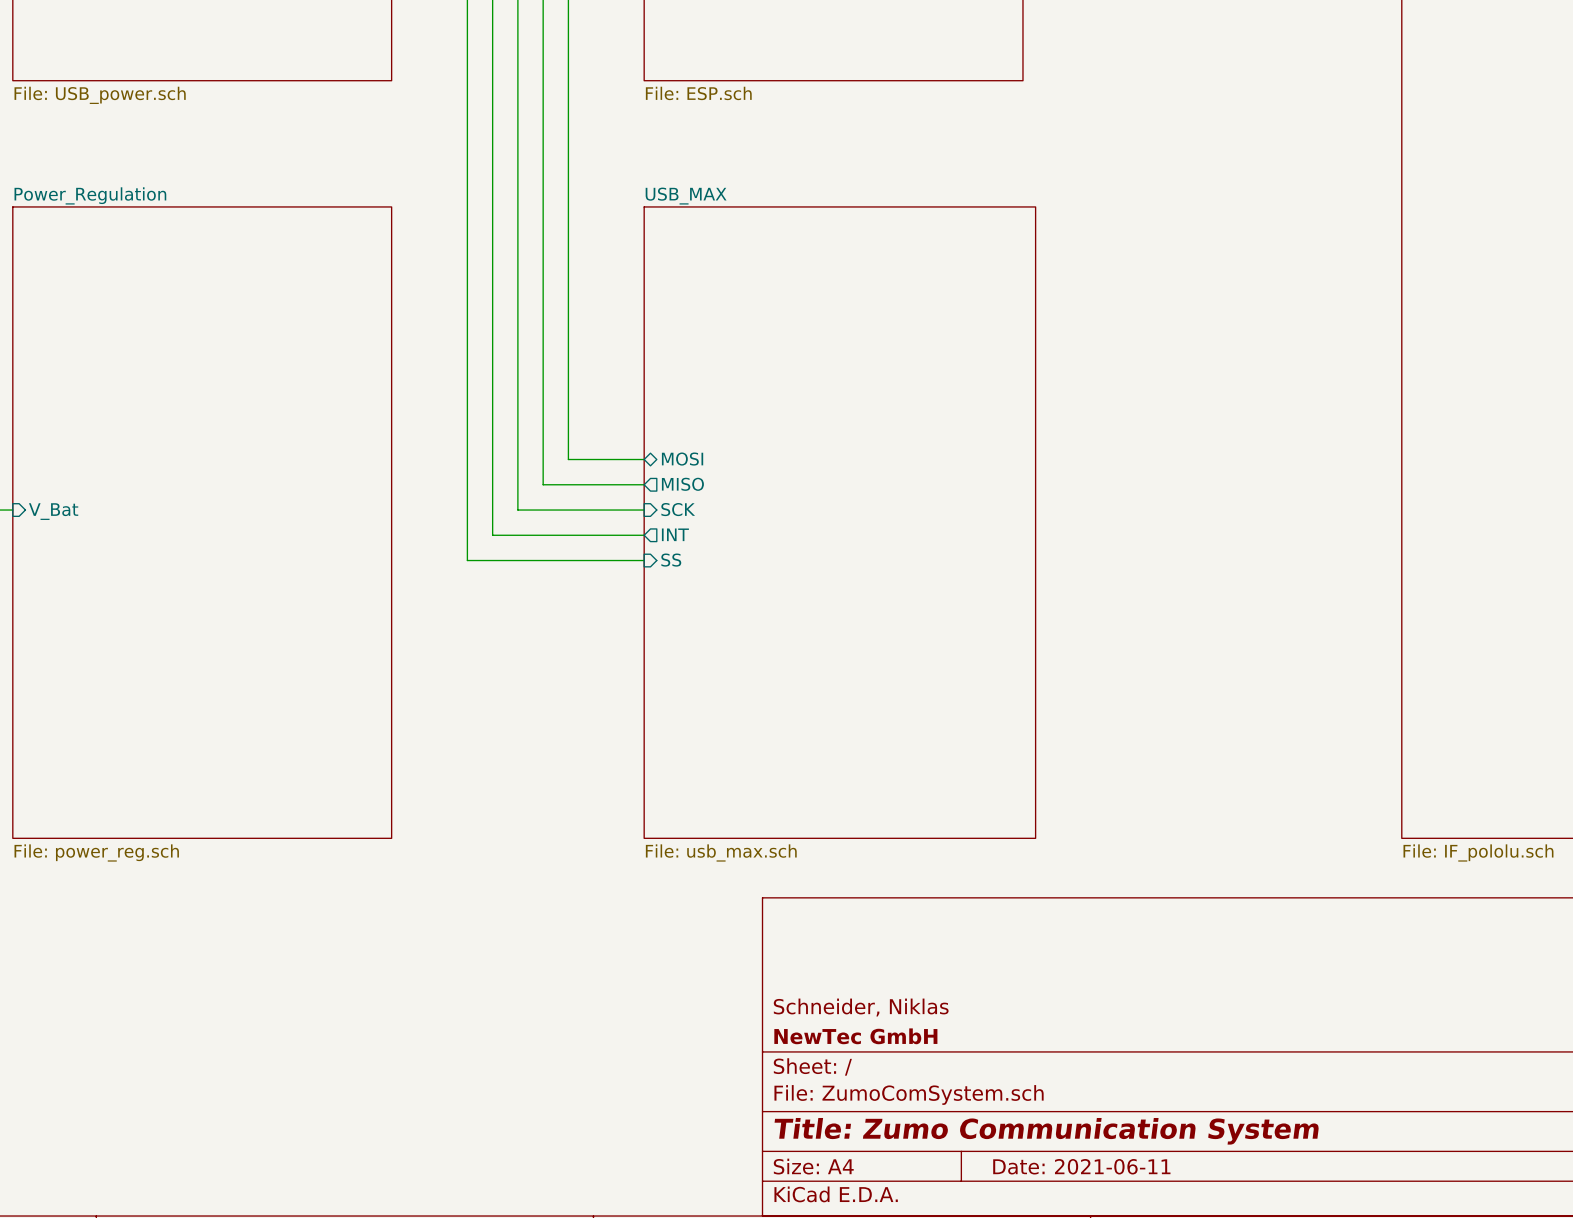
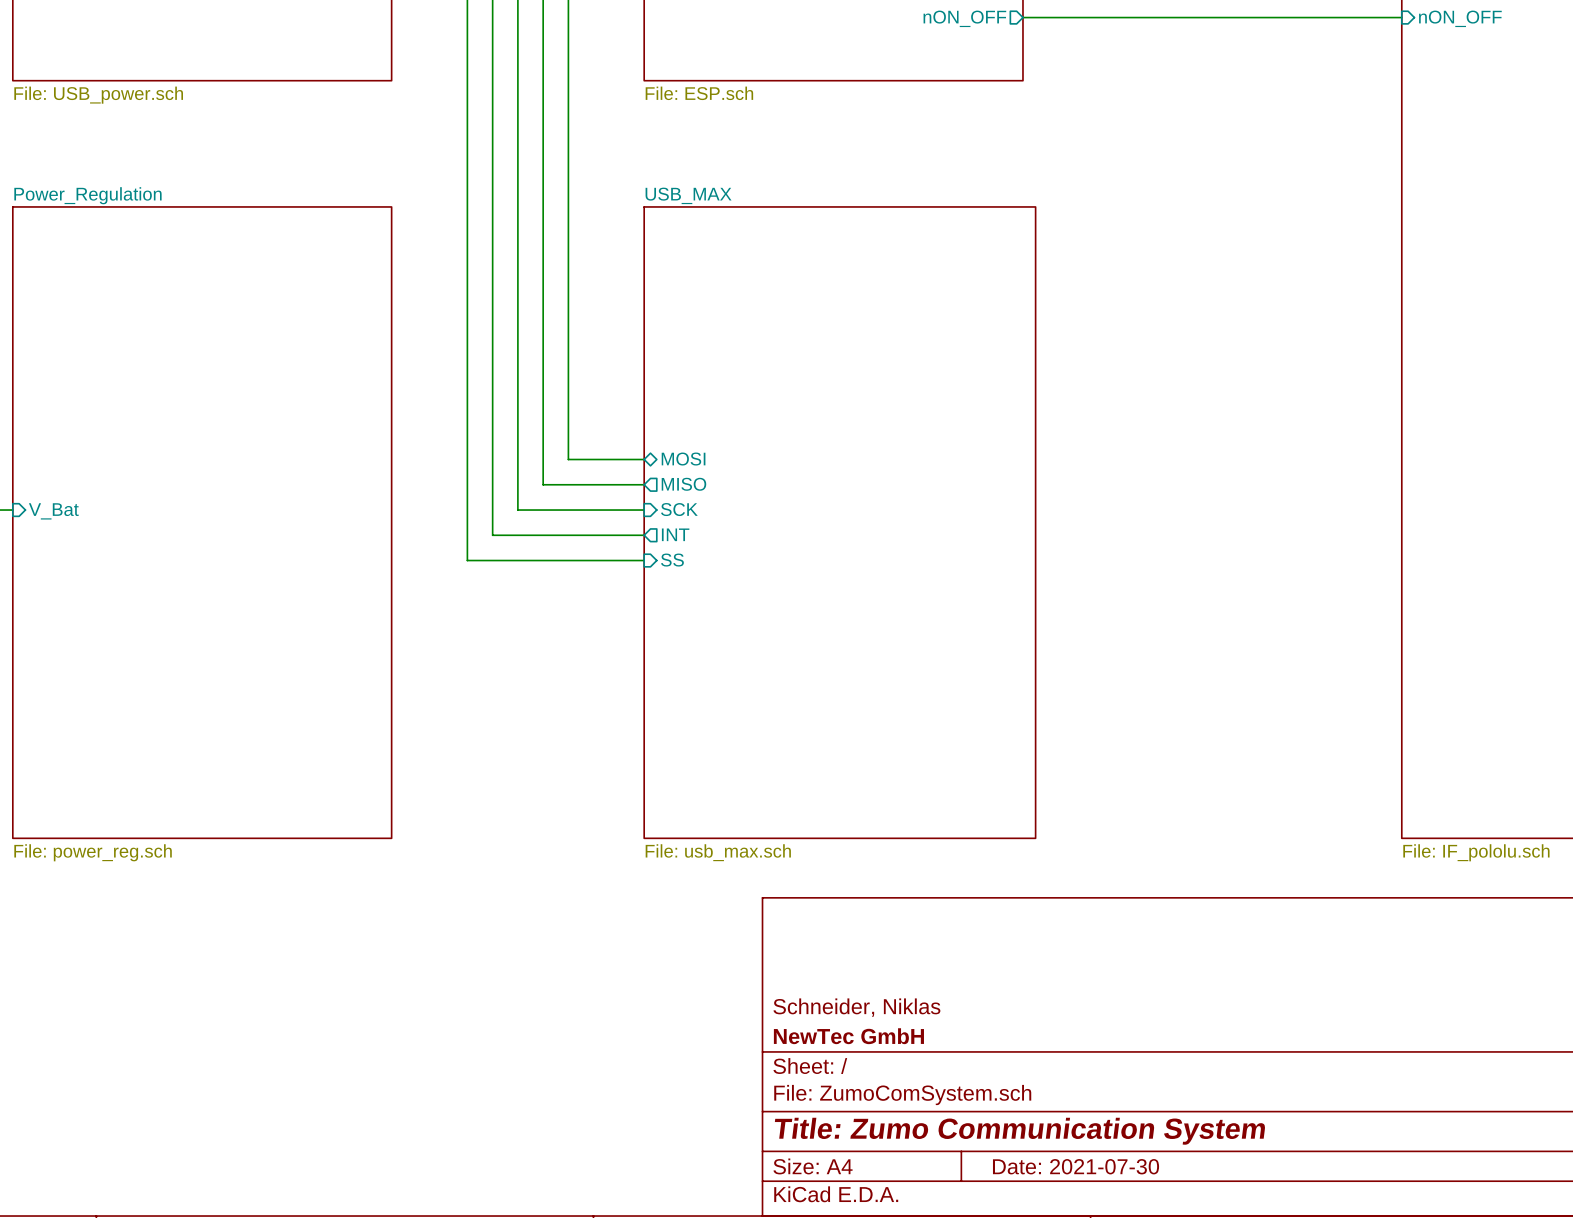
wire: none -> (1022, 17) (1401, 17)
sheet pin: none -> nON_OFF (964, 18)
sheet pin: none -> nON_OFF (1460, 18)
title block: Date: 2021-06-11 (1081, 1166) -> Date: 2021-07-30 (1076, 1166)

